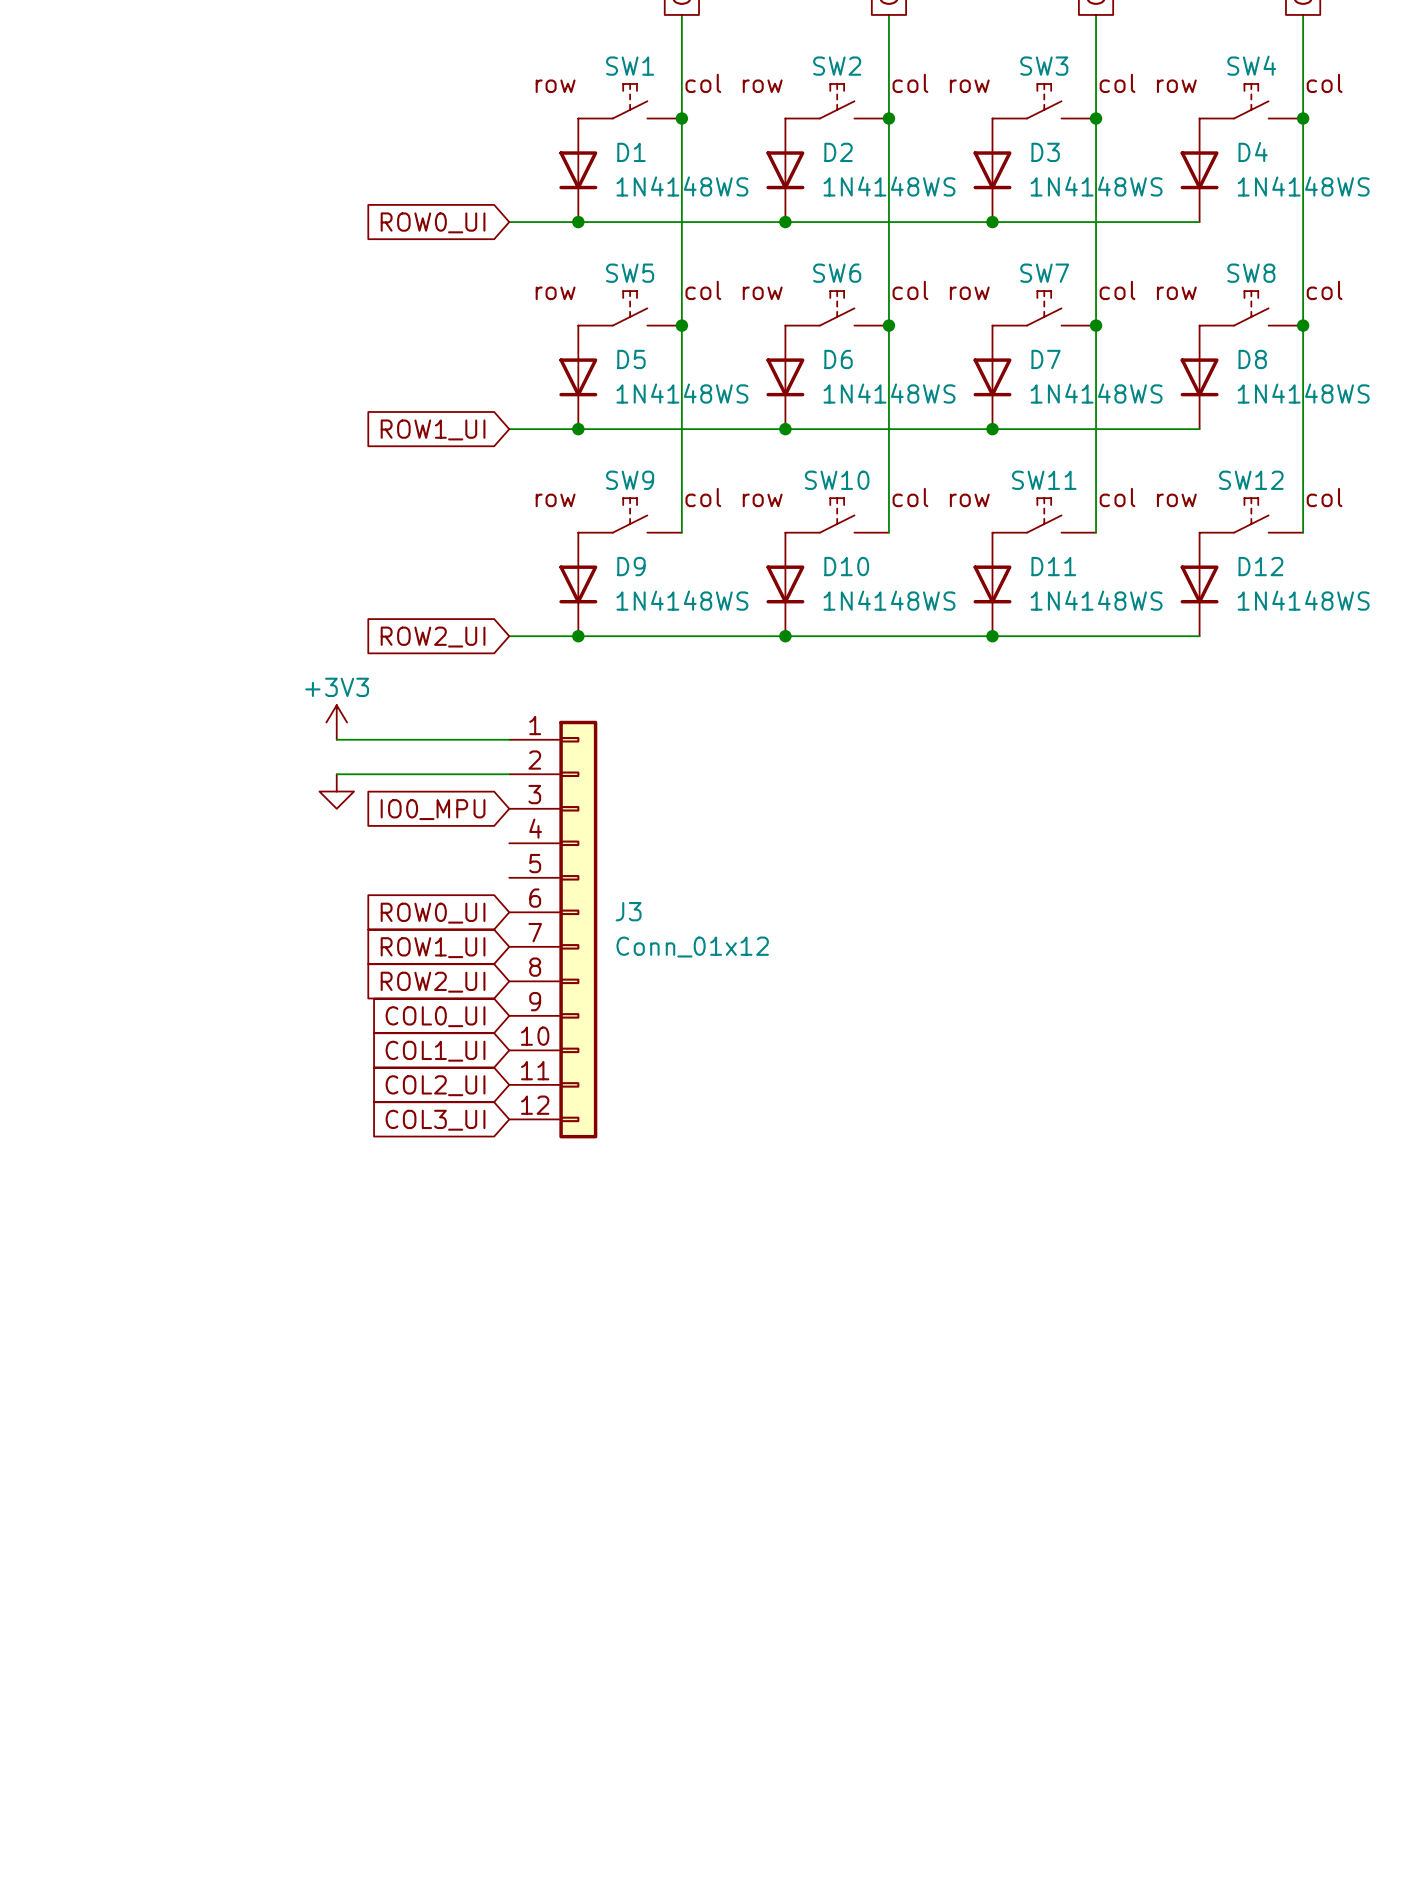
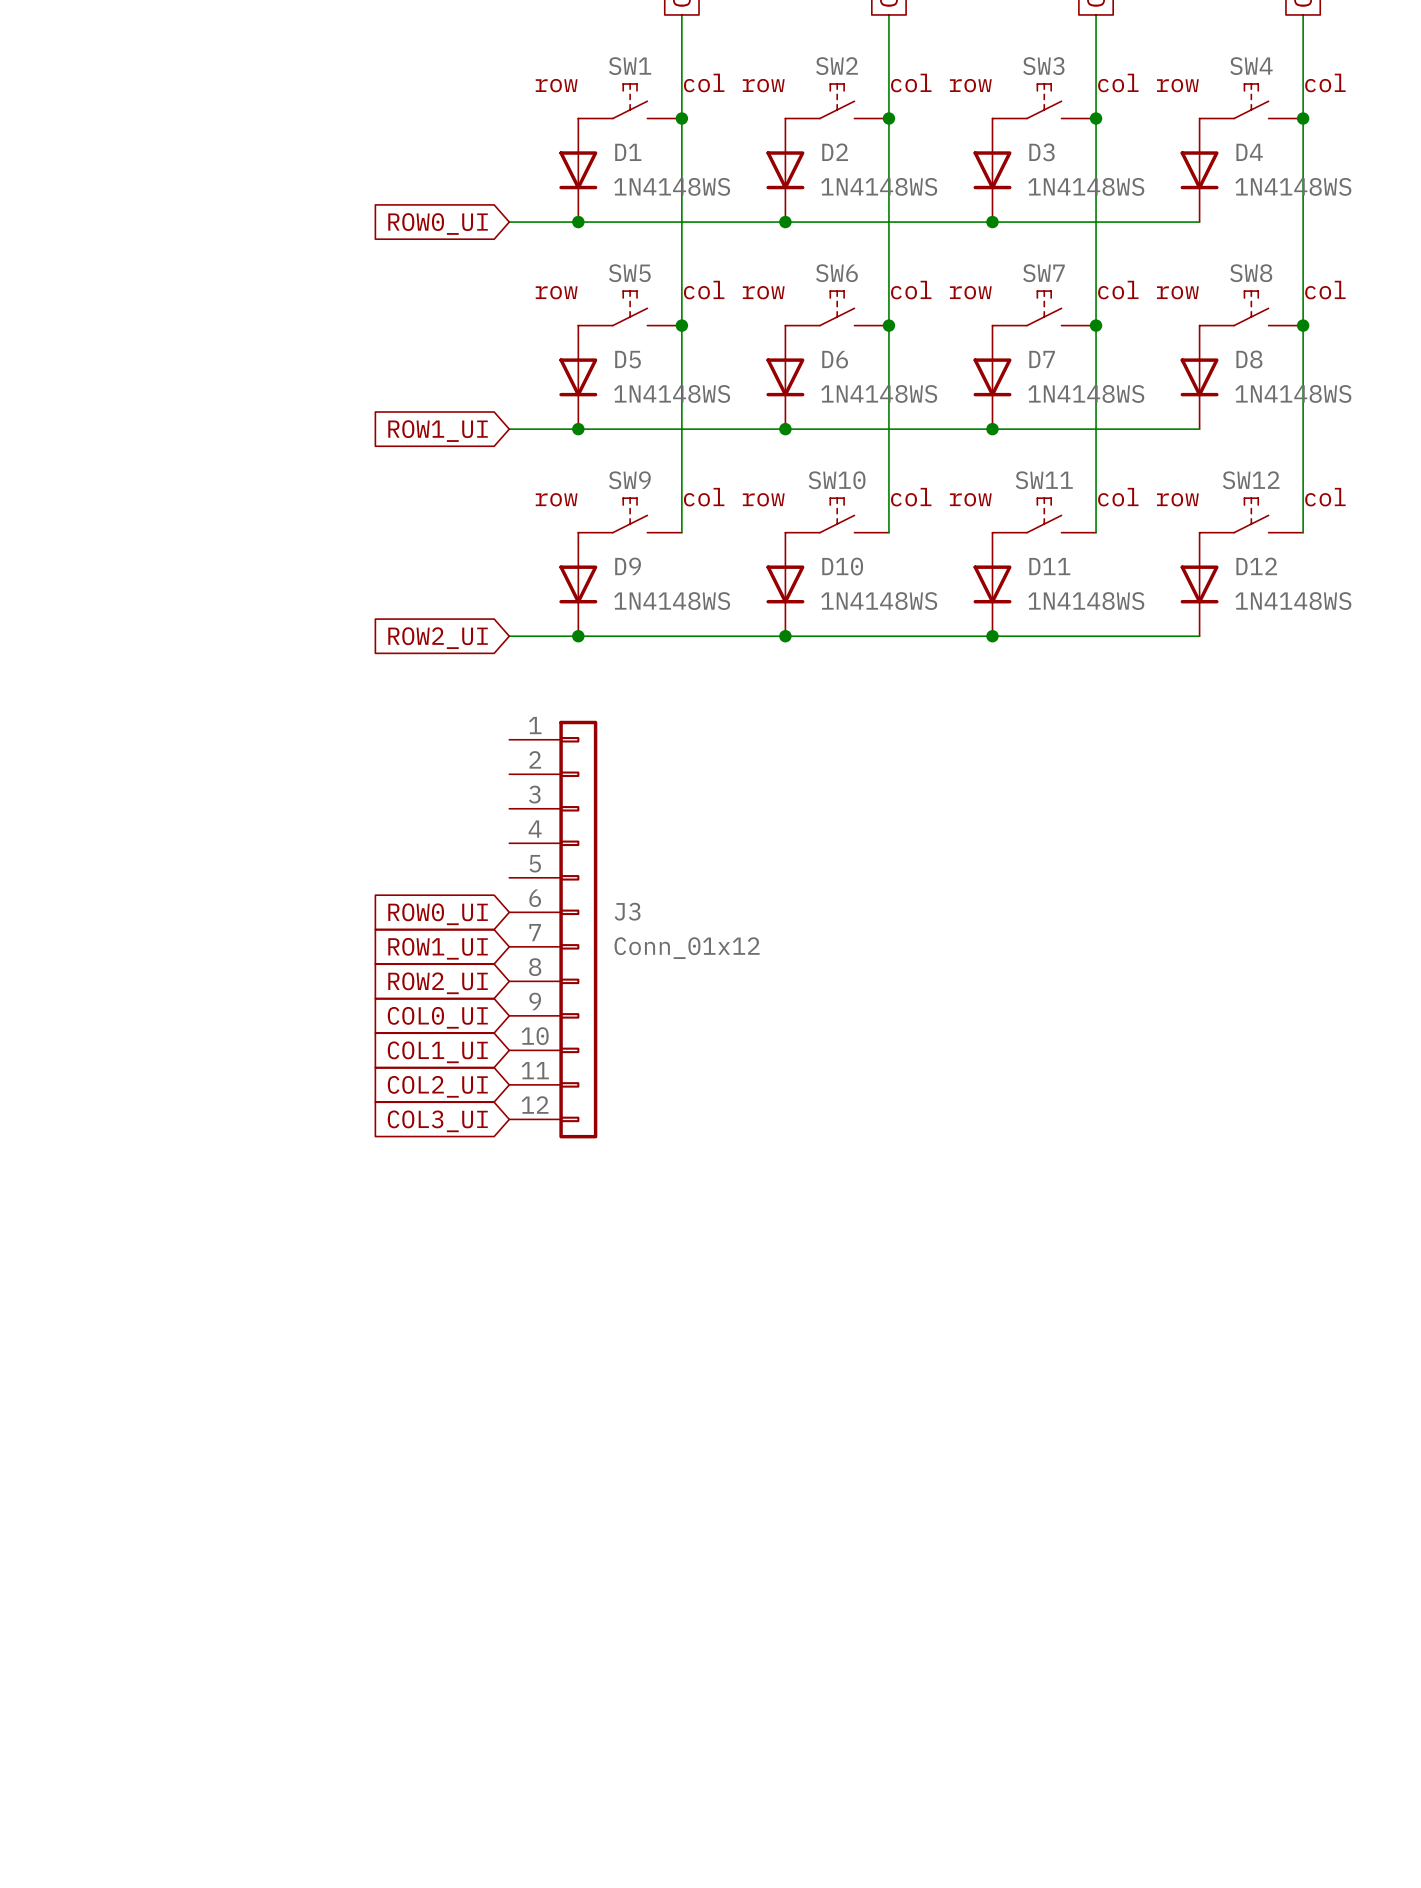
power symbol: +3V3 (336, 722) -> none
wire: (336, 739) (509, 739) -> none
wire: (336, 774) (509, 774) -> none
power symbol: (336, 791) -> none
global label: IO0_MPU (433, 809) -> none

